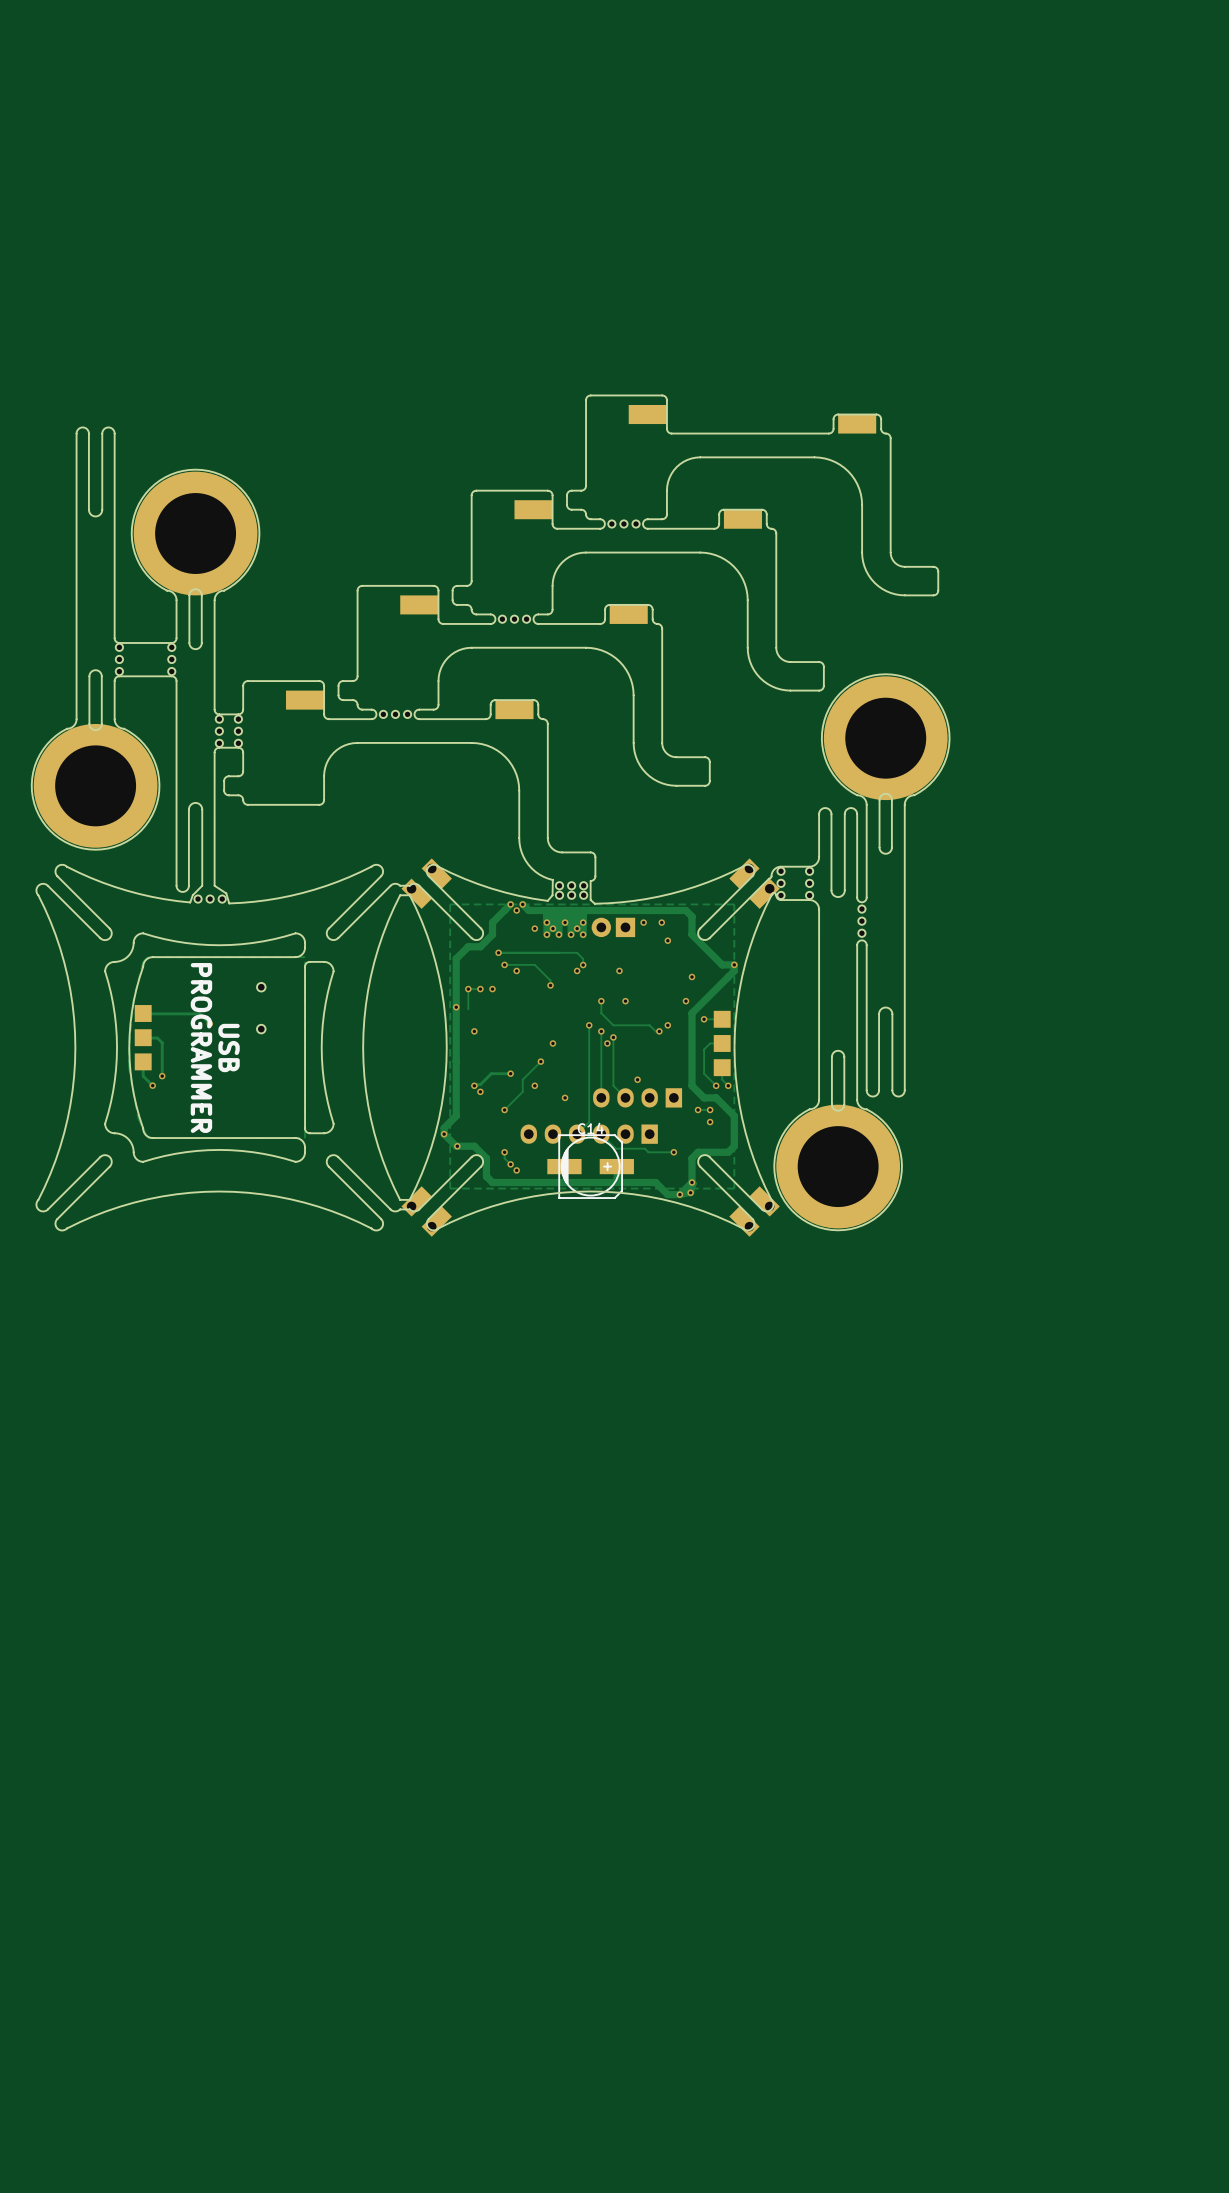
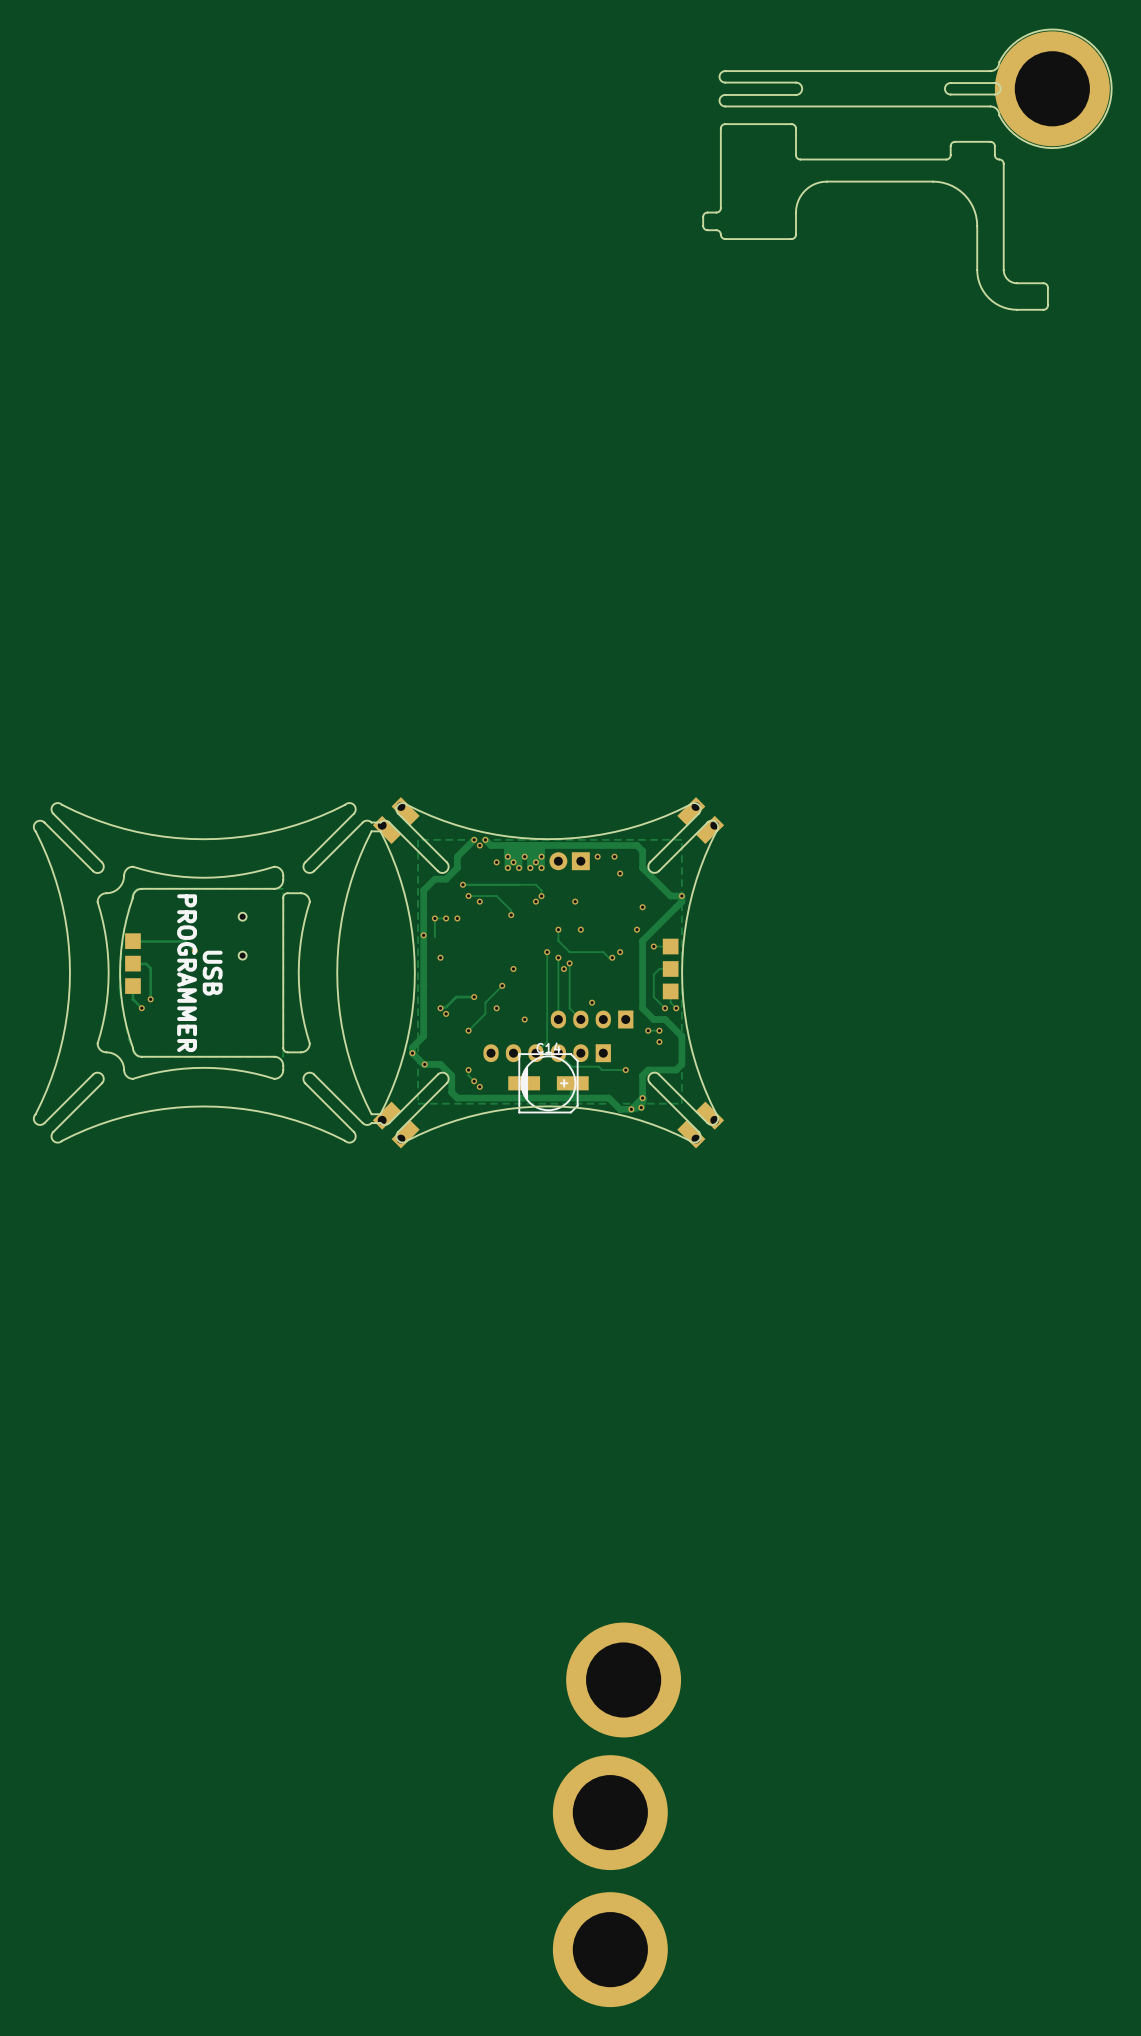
board edge: none -> (999, 62) (996, 68) (990, 71) (724, 71) (719, 76) (723, 82) (796, 82) (800, 85) (802, 89) (796, 94) (724, 95) (720, 97) (719, 101) (725, 106) (991, 106) (997, 109) (1005, 125) (1018, 137) (1034, 145) (1051, 148) (1068, 145) (1084, 138) (1093, 131) (1104, 117) (1111, 94) (1109, 71) (1097, 50) (1079, 36) (1057, 29) (1034, 32) (1013, 43) (999, 62)
board edge: none -> (994, 83) (949, 83) (946, 85) (945, 89) (949, 94) (995, 94) (1000, 88) (998, 84) (994, 83)
part: none -> (1052, 88)
board edge: none -> (791, 124) (725, 124) (721, 125) (720, 208) (717, 212) (704, 214) (703, 225) (704, 229) (718, 230) (724, 239) (792, 239) (795, 235) (796, 208) (798, 200) (805, 190) (815, 183) (826, 181) (942, 182) (960, 191) (967, 198) (974, 211) (977, 225) (977, 274) (985, 294) (995, 303) (1008, 308) (1043, 309) (1047, 308) (1047, 287) (1046, 284) (1013, 282) (1007, 279) (1004, 273) (1003, 163) (995, 157) (993, 142) (953, 142) (950, 145) (950, 156) (946, 159) (799, 159) (796, 155) (795, 127) (791, 124)
part: (647, 414) -> none
part: (857, 424) -> none
part: (533, 509) -> none
board edge: (666, 514) (663, 519) (645, 519) (643, 526) (647, 528) (715, 528) (718, 525) (719, 513) (722, 510) (765, 511) (767, 526) (776, 532) (776, 651) (780, 657) (786, 661) (822, 663) (823, 666) (823, 688) (819, 690) (781, 689) (767, 684) (757, 674) (750, 661) (747, 652) (747, 600) (745, 584) (733, 566) (715, 555) (700, 552) (585, 552) (569, 557) (559, 565) (553, 577) (551, 612) (548, 614) (535, 615) (534, 621) (538, 623) (600, 623) (605, 619) -> none
board edge: (666, 514) (667, 486) (669, 477) (676, 467) (687, 459) (700, 457) (825, 458) (839, 464) (848, 471) (859, 489) (862, 504) (862, 557) (866, 571) (871, 579) (882, 588) (895, 594) (933, 595) (938, 591) (938, 570) (936, 567) (901, 566) (894, 562) (891, 556) (890, 437) (881, 431) (881, 418) (878, 415) (836, 414) (833, 418) (833, 430) (829, 433) (671, 433) (666, 429) (666, 399) (664, 395) (590, 395) (586, 400) (585, 487) (582, 490) (568, 492) (567, 505) (570, 509) (583, 510) (588, 518) (602, 519) (604, 523) (603, 527) (554, 527) (552, 523) (552, 494) (549, 490) (476, 490) (472, 493) (471, 581) (468, 585) (454, 587) (452, 600) (456, 604) (469, 605) (474, 614) (493, 615) (495, 619) (493, 622) (440, 623) (438, 619) (438, 590) (434, 586) (361, 586) (357, 590) (357, 677) (354, 680) (339, 682) (338, 695) (342, 699) (355, 700) (360, 709) (374, 710) (376, 713) (375, 717) (326, 718) (324, 715) (324, 685) (319, 681) (246, 681) (243, 685) (242, 712) (239, 714) (218, 714) (214, 709) (214, 598) (218, 592) (239, 579) (254, 559) (259, 534) (256, 515) (252, 504) (245, 493) (231, 480) (214, 472) (201, 469) (176, 472) (159, 480) (150, 488) (138, 504) (134, 515) (131, 534) (133, 547) (139, 564) (147, 575) (156, 583) (171, 591) (175, 596) (176, 639) (171, 642) (117, 642) (114, 638) (114, 432) (112, 428) (108, 427) (102, 432) (102, 510) (99, 515) (94, 516) (89, 510) (88, 432) (85, 428) (80, 427) (76, 433) (76, 720) (72, 726) (56, 735) (43, 749) (34, 766) (31, 784) (34, 803) (42, 820) (59, 838) (76, 846) (101, 849) (125, 842) (145, 825) (156, 803) (159, 778) (151, 754) (134, 735) (117, 725) (114, 719) -> none
part: (742, 519) -> none
part: (623, 523) -> none
part: (195, 533) -> none
board edge: (201, 595) (201, 643) (199, 647) (194, 649) (189, 643) (189, 594) (191, 590) (196, 589) (199, 591) (201, 595) -> none
part: (419, 604) -> none
part: (628, 614) -> none
part: (514, 619) -> none
board edge: (605, 619) (605, 608) (608, 605) (647, 604) (652, 607) (653, 621) (662, 628) (662, 746) (666, 753) (672, 756) (707, 758) (709, 761) (709, 781) (707, 785) (666, 784) (653, 779) (642, 769) (637, 761) (633, 747) (633, 695) (630, 679) (619, 661) (611, 655) (596, 648) (471, 647) (459, 650) (448, 657) (441, 668) (438, 676) (437, 707) (434, 709) (417, 709) (414, 713) (415, 716) (419, 719) (486, 719) (490, 716) (490, 703) (493, 700) (536, 701) (538, 716) (547, 723) (548, 841) (551, 848) (558, 851) (591, 852) (594, 854) (595, 876) (590, 880) (590, 900) (594, 903) (633, 900) (671, 893) (707, 882) (742, 866) -> none
part: (119, 659) -> none
part: (171, 659) -> none
board edge: (101, 676) (101, 724) (99, 728) (94, 730) (89, 724) (89, 675) (91, 671) (95, 670) (99, 672) (101, 676) -> none
part: (305, 700) -> none
part: (514, 709) -> none
part: (395, 714) -> none
board edge: (114, 719) (114, 681) (117, 676) (171, 676) (175, 678) (176, 886) (178, 890) (182, 891) (188, 887) (188, 808) (191, 804) (195, 802) (199, 804) (202, 808) (202, 885) (192, 895) (190, 902) (177, 901) (151, 896) (114, 886) (66, 866) -> none
part: (219, 731) -> none
part: (238, 731) -> none
part: (885, 738) -> none
part: (95, 785) -> none
board edge: (891, 799) (891, 848) (889, 852) (884, 853) (879, 848) (879, 799) (881, 795) (885, 793) (890, 795) (891, 799) -> none
board edge: (371, 866) (337, 881) (302, 893) (266, 900) (229, 903) -> (345, 804) (308, 820) (269, 832) (243, 836) (203, 839) (163, 836) (137, 832) (98, 820) (62, 804)
board edge: (438, 866) (491, 888) (547, 900) (552, 895) (552, 879) -> (407, 804) (443, 820) (482, 831) (521, 838) (548, 839) (575, 838) (614, 831) (653, 820) (689, 804)
board edge: (552, 879) (535, 871) (523, 856) (519, 842) (519, 790) (516, 774) (505, 756) (487, 745) (471, 742) (357, 742) (344, 745) (333, 752) (326, 763) (324, 771) (324, 800) (319, 804) (247, 804) (240, 795) (226, 794) (224, 791) (225, 778) (239, 776) (242, 773) (243, 751) (239, 747) (218, 747) (214, 752) (214, 885) (226, 893) (229, 903) -> none
part: (781, 883) -> none
part: (809, 883) -> none
part: (571, 885) -> none
board edge: (761, 885) (771, 877) (772, 871) (777, 867) (810, 866) (817, 862) (819, 857) (819, 813) (821, 809) (825, 808) (831, 813) (831, 891) (835, 896) (842, 895) (844, 890) (844, 813) (847, 809) (851, 808) (855, 810) (857, 814) (857, 898) (860, 902) (865, 900) (866, 802) (862, 797) (841, 784) (830, 769) (822, 745) (824, 720) (829, 708) (840, 693) (849, 685) (867, 677) (885, 674) (898, 675) (916, 681) (926, 689) (942, 708) (948, 726) (949, 739) (946, 757) (938, 774) (924, 788) (908, 797) (904, 803) (904, 1090) (900, 1096) (895, 1095) (892, 1091) (892, 1013) (886, 1007) (881, 1008) (879, 1013) (878, 1091) (872, 1096) (866, 1091) (866, 944) (861, 940) (857, 945) (857, 1101) (860, 1107) (882, 1120) (893, 1135) (901, 1159) (900, 1178) (894, 1195) (883, 1211) (868, 1222) (850, 1229) (825, 1229) (807, 1222) (788, 1206) (776, 1184) (774, 1159) (782, 1135) (794, 1120) (804, 1112) (815, 1107) (819, 1101) (819, 909) (817, 903) (812, 900) (780, 899) (775, 893) (771, 895) -> (707, 822) (712, 820) (716, 822) (718, 826) (716, 831)
part: (571, 895) -> none
part: (210, 899) -> none
part: (861, 921) -> none
board edge: (844, 1056) (844, 1105) (841, 1109) (837, 1110) (831, 1105) (831, 1056) (834, 1052) (838, 1050) (842, 1052) (844, 1056) -> none
part: (838, 1166) -> none
part: none -> (623, 1680)
part: none -> (610, 1812)
part: none -> (610, 1949)

